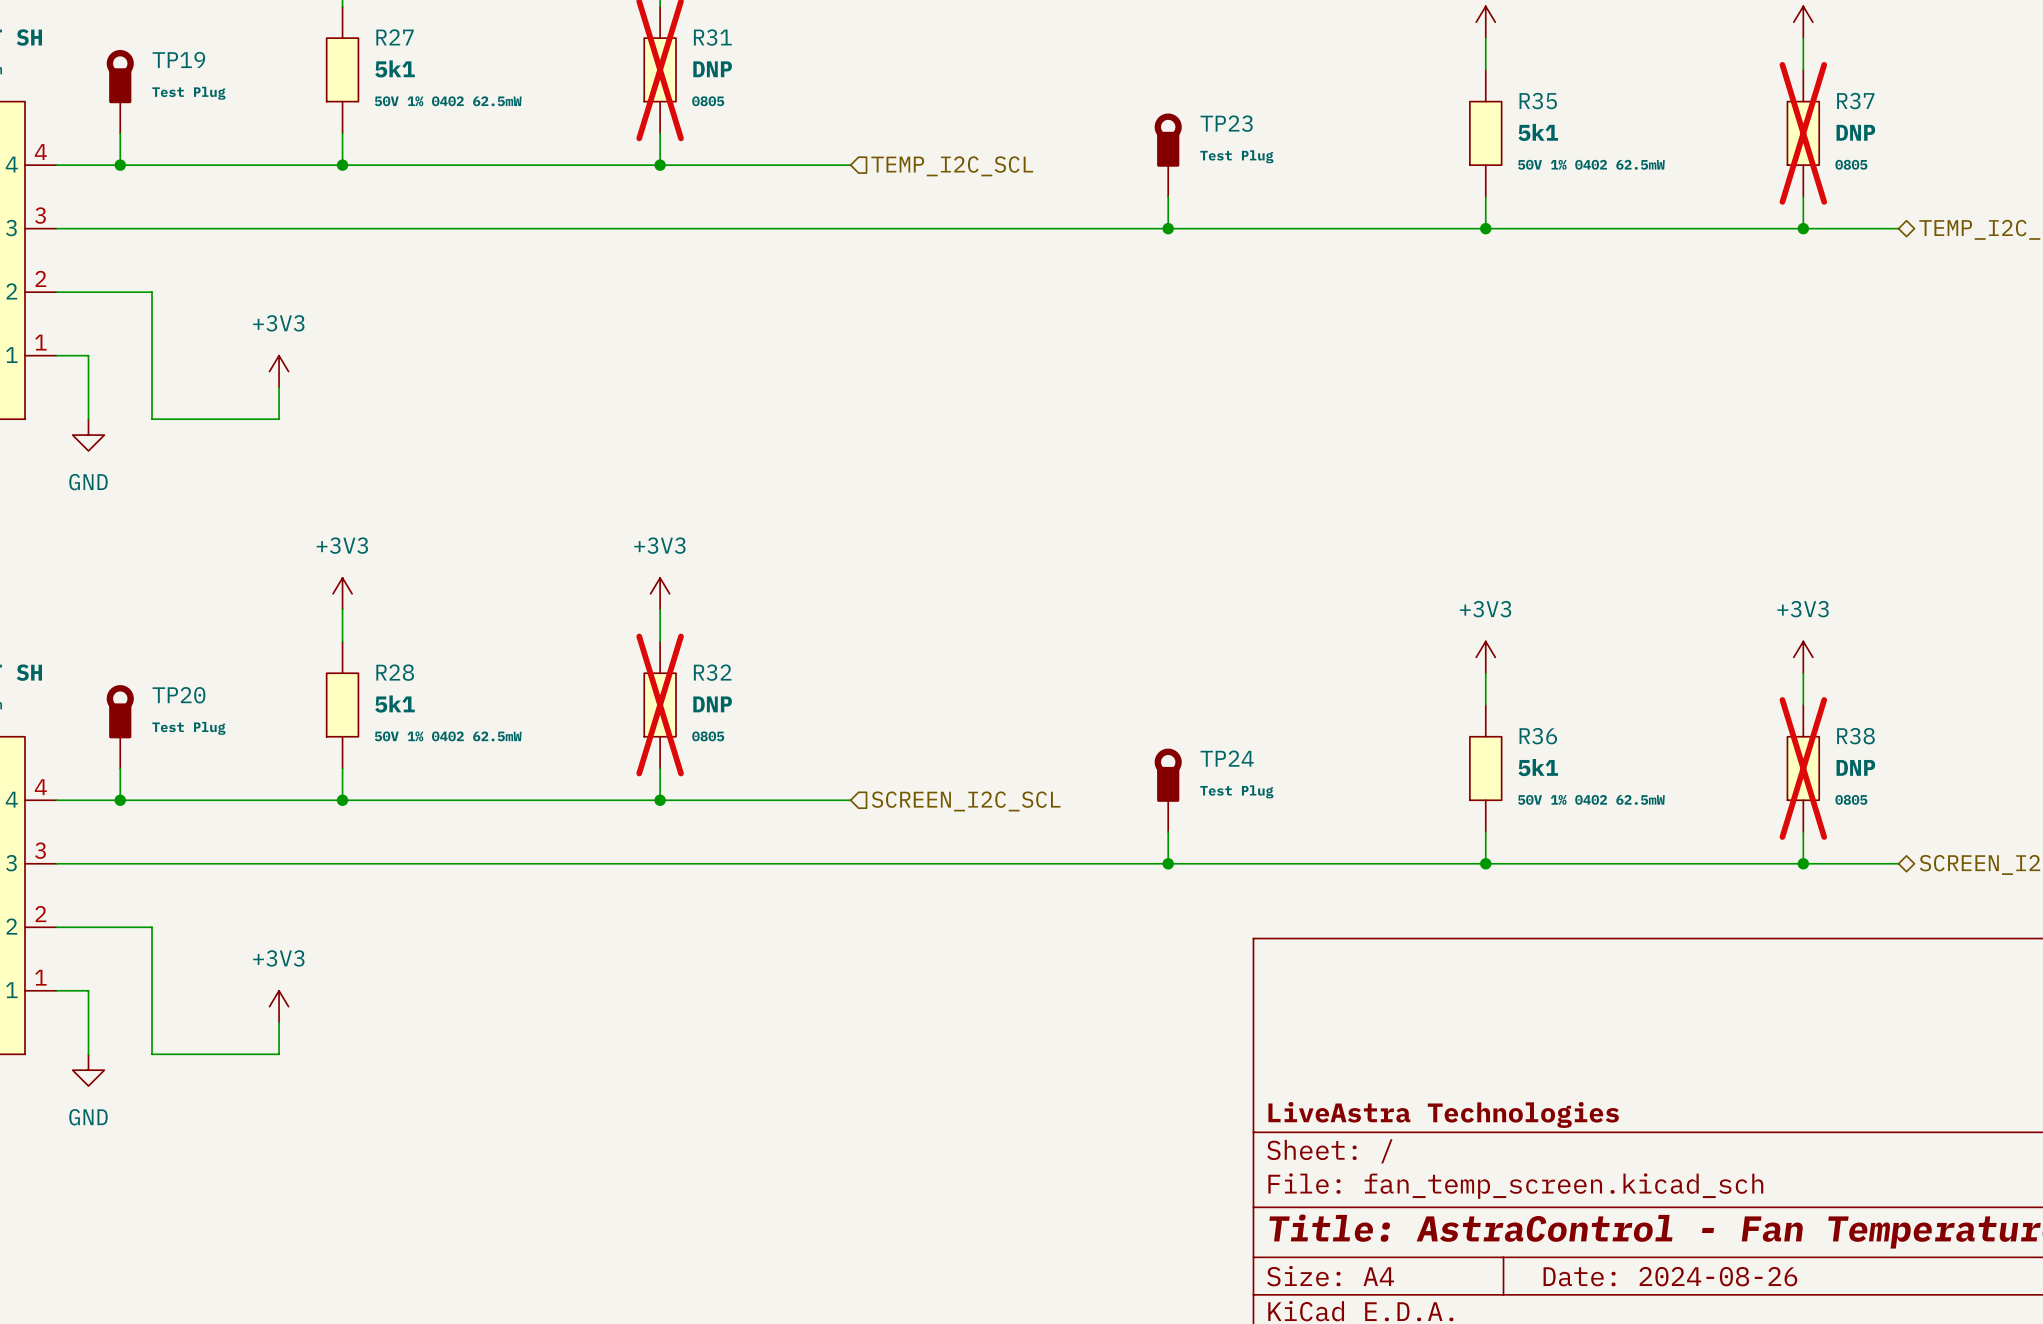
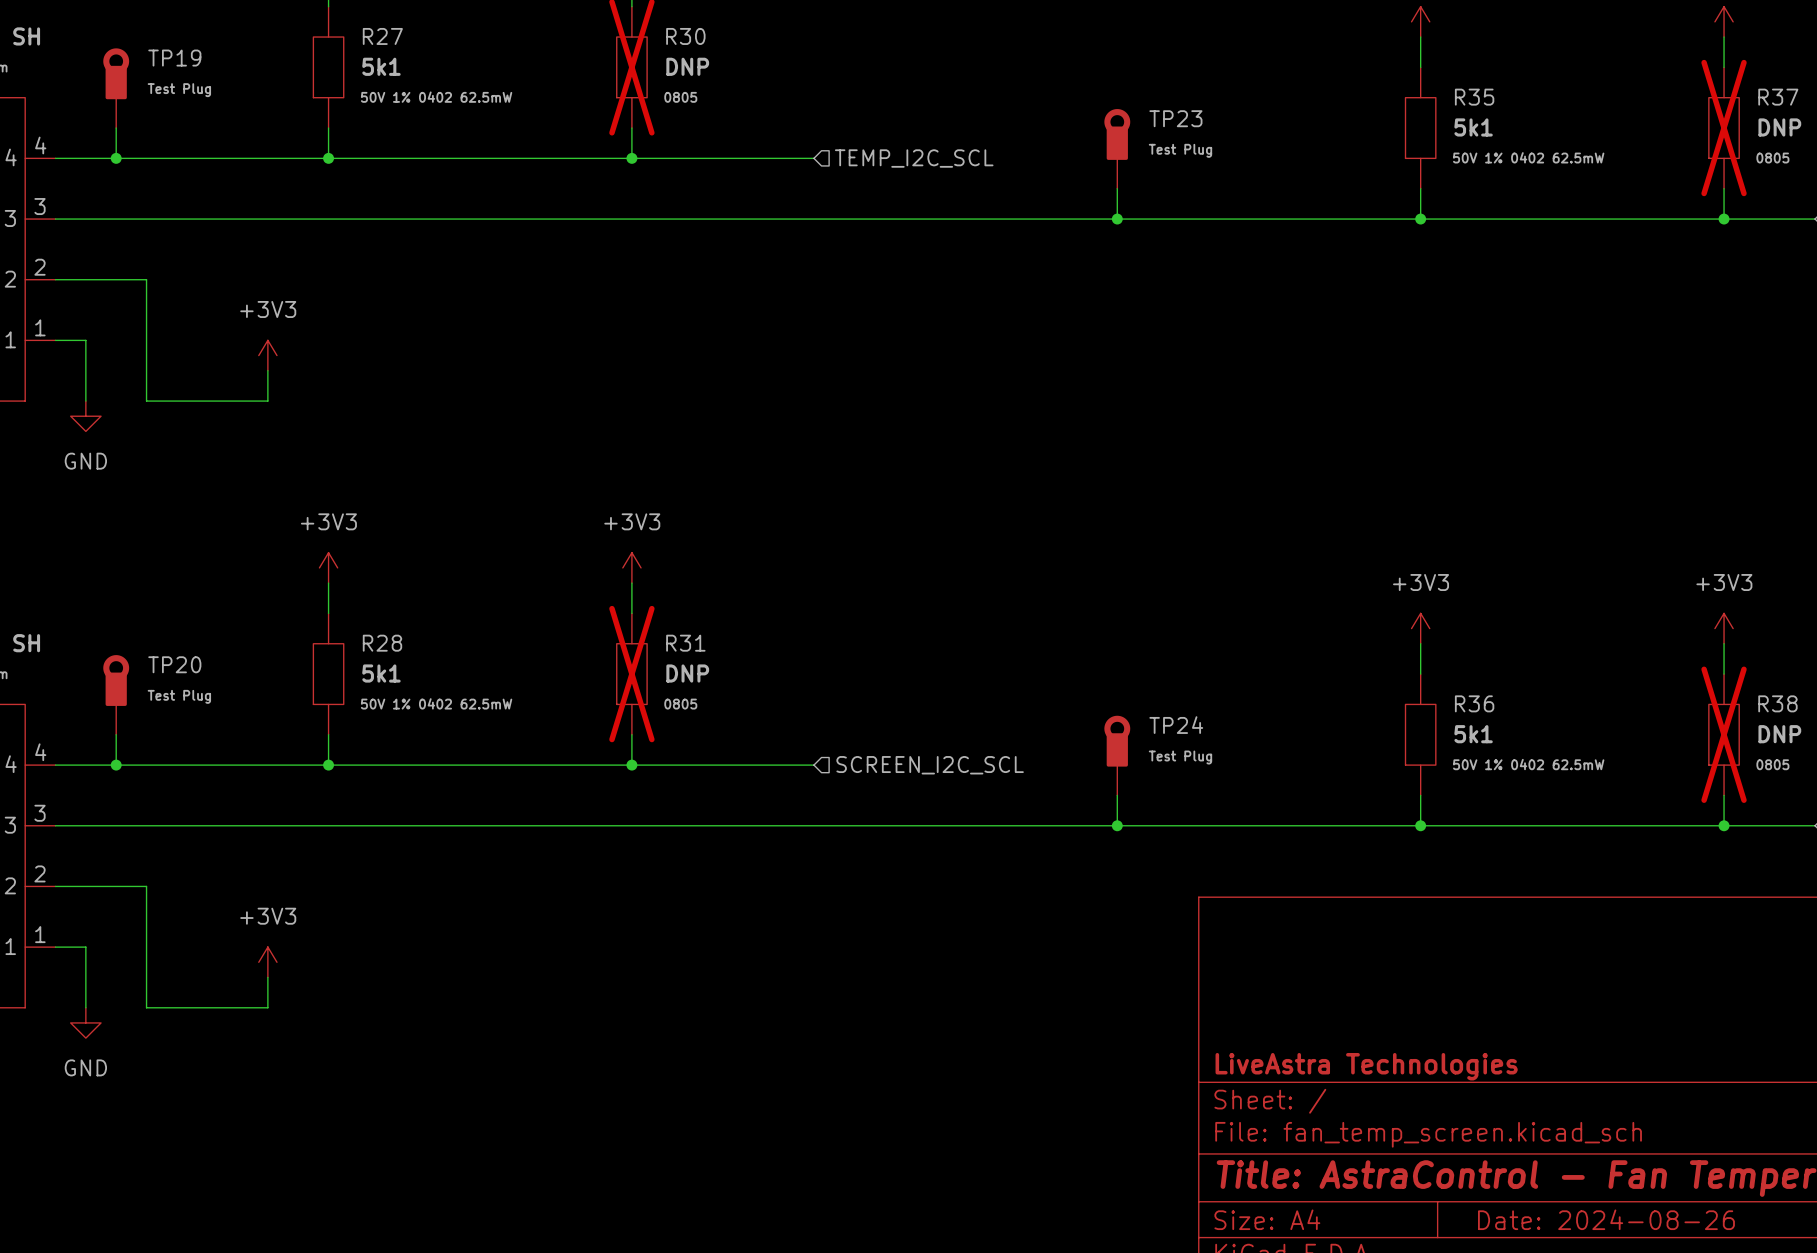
R31 name: R31 (712, 37) -> R30 (685, 36)
R32 name: R32 (712, 672) -> R31 (685, 643)

